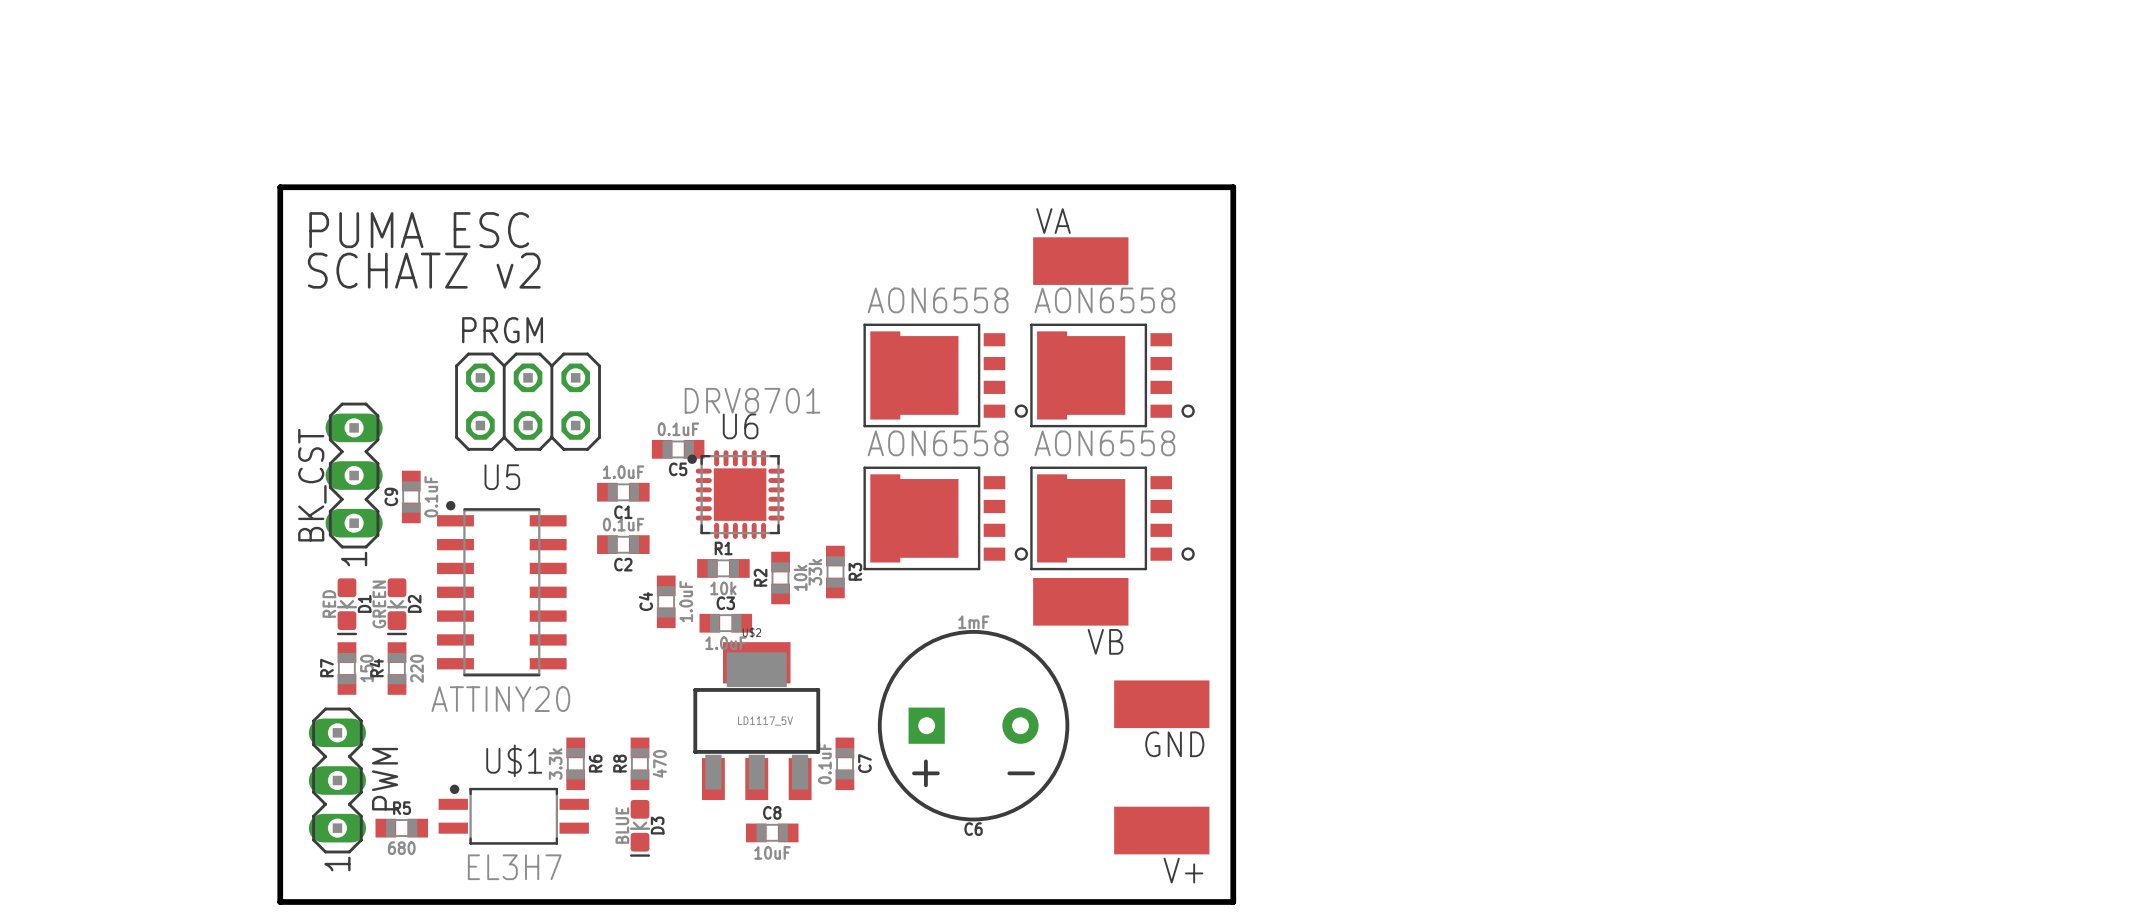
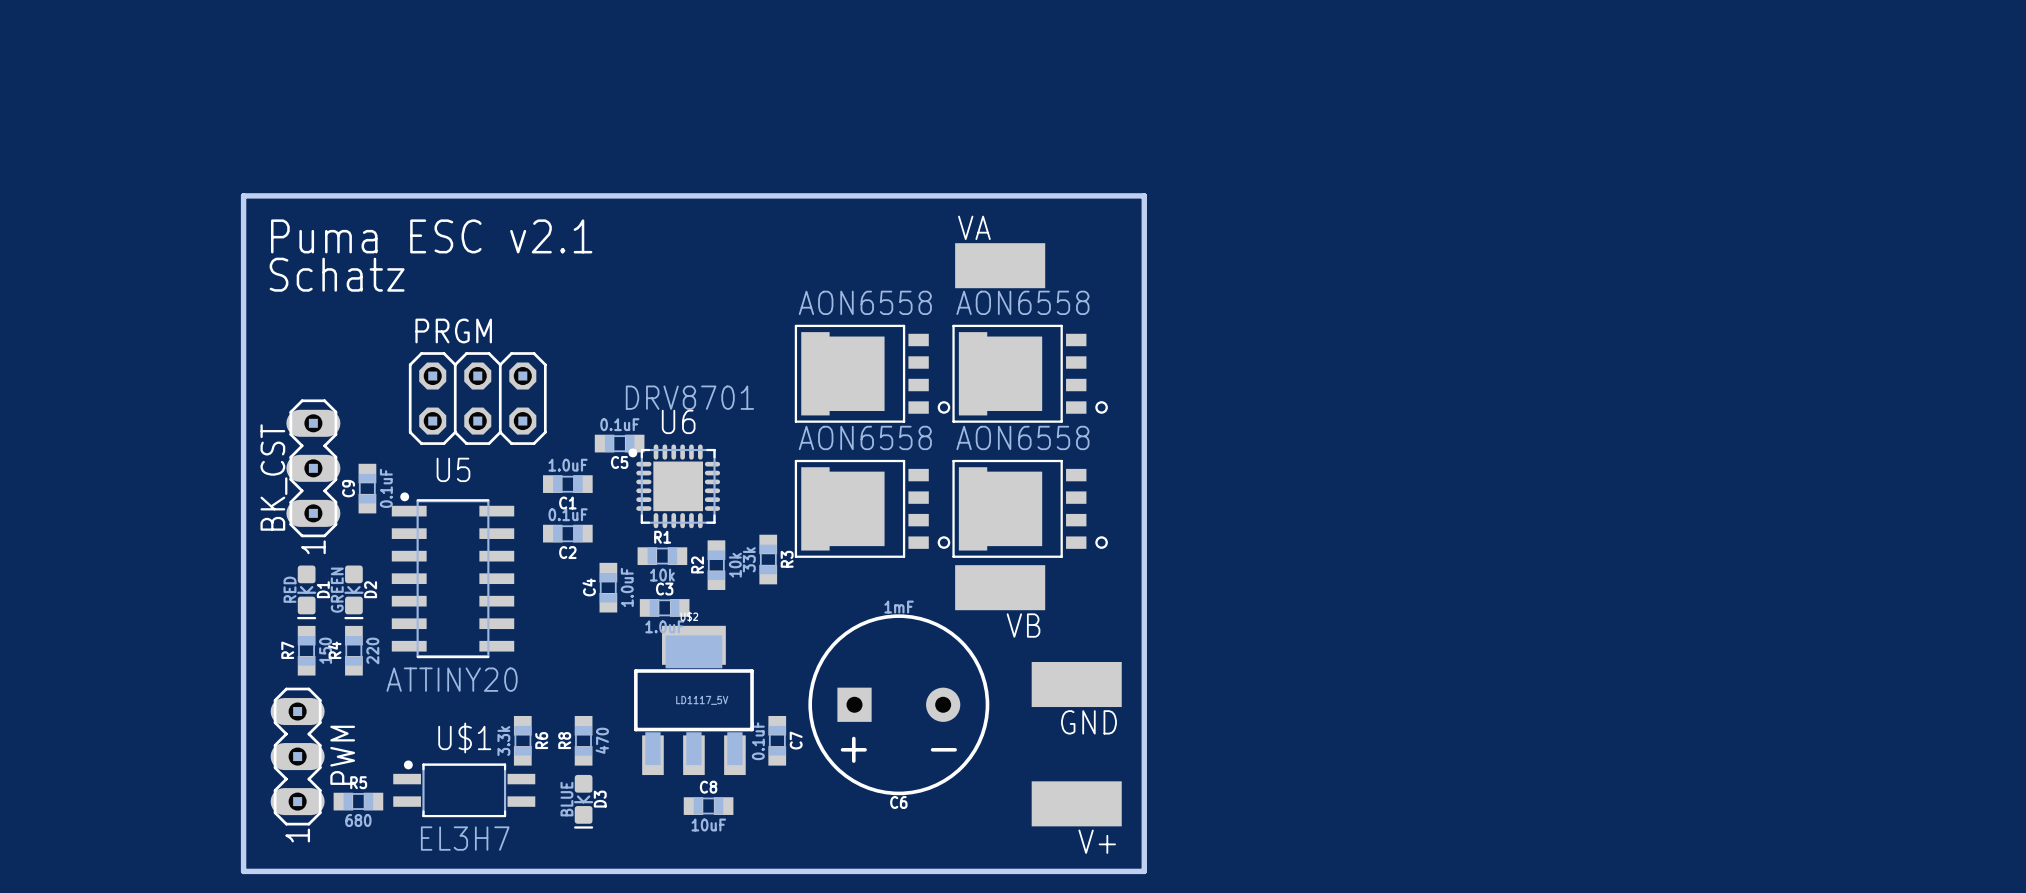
text: PUMA ESC (419, 230) -> Puma ESC v2.1 (431, 236)
text: SCHATZ v2 (424, 270) -> Schatz (337, 274)

